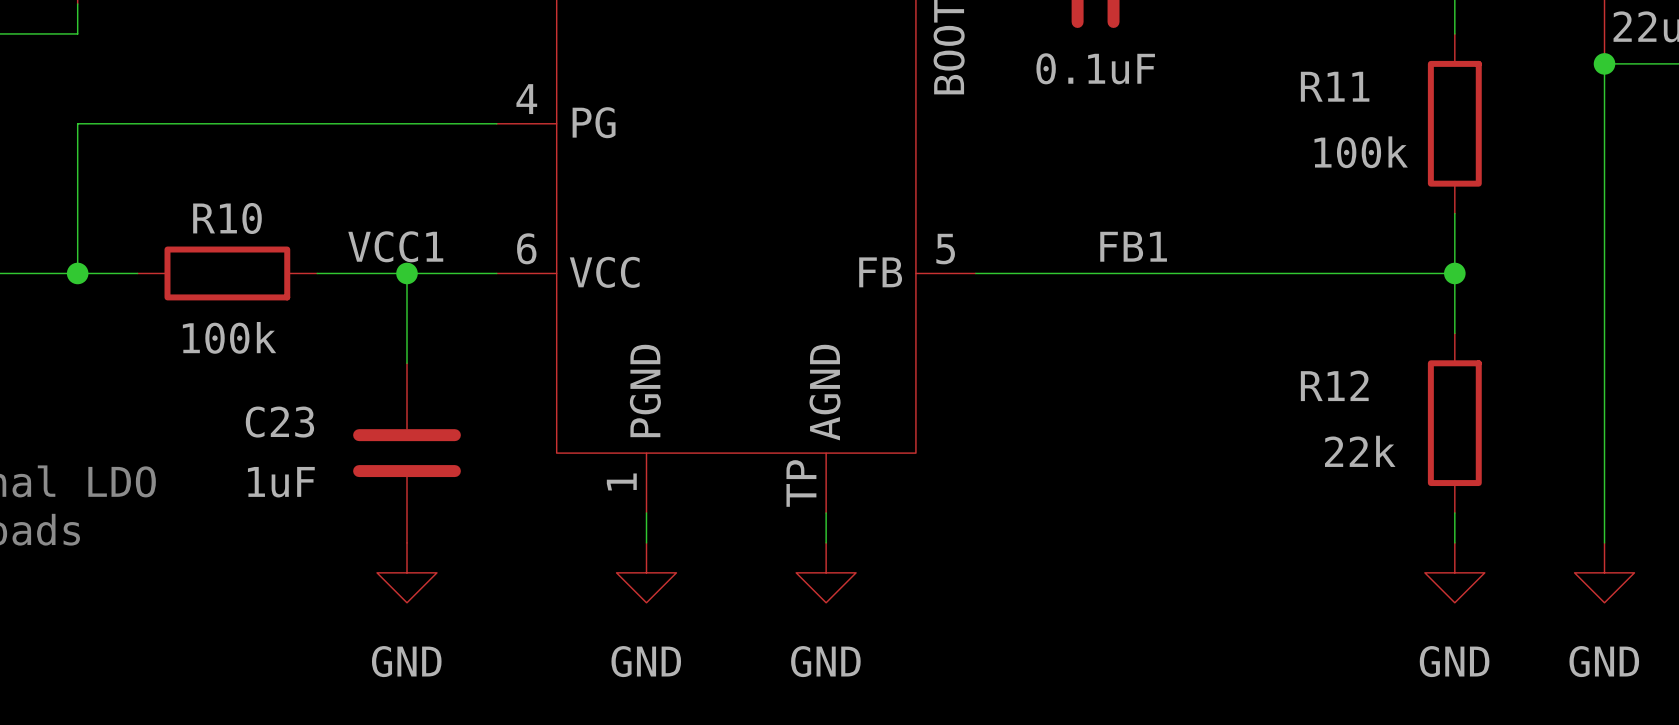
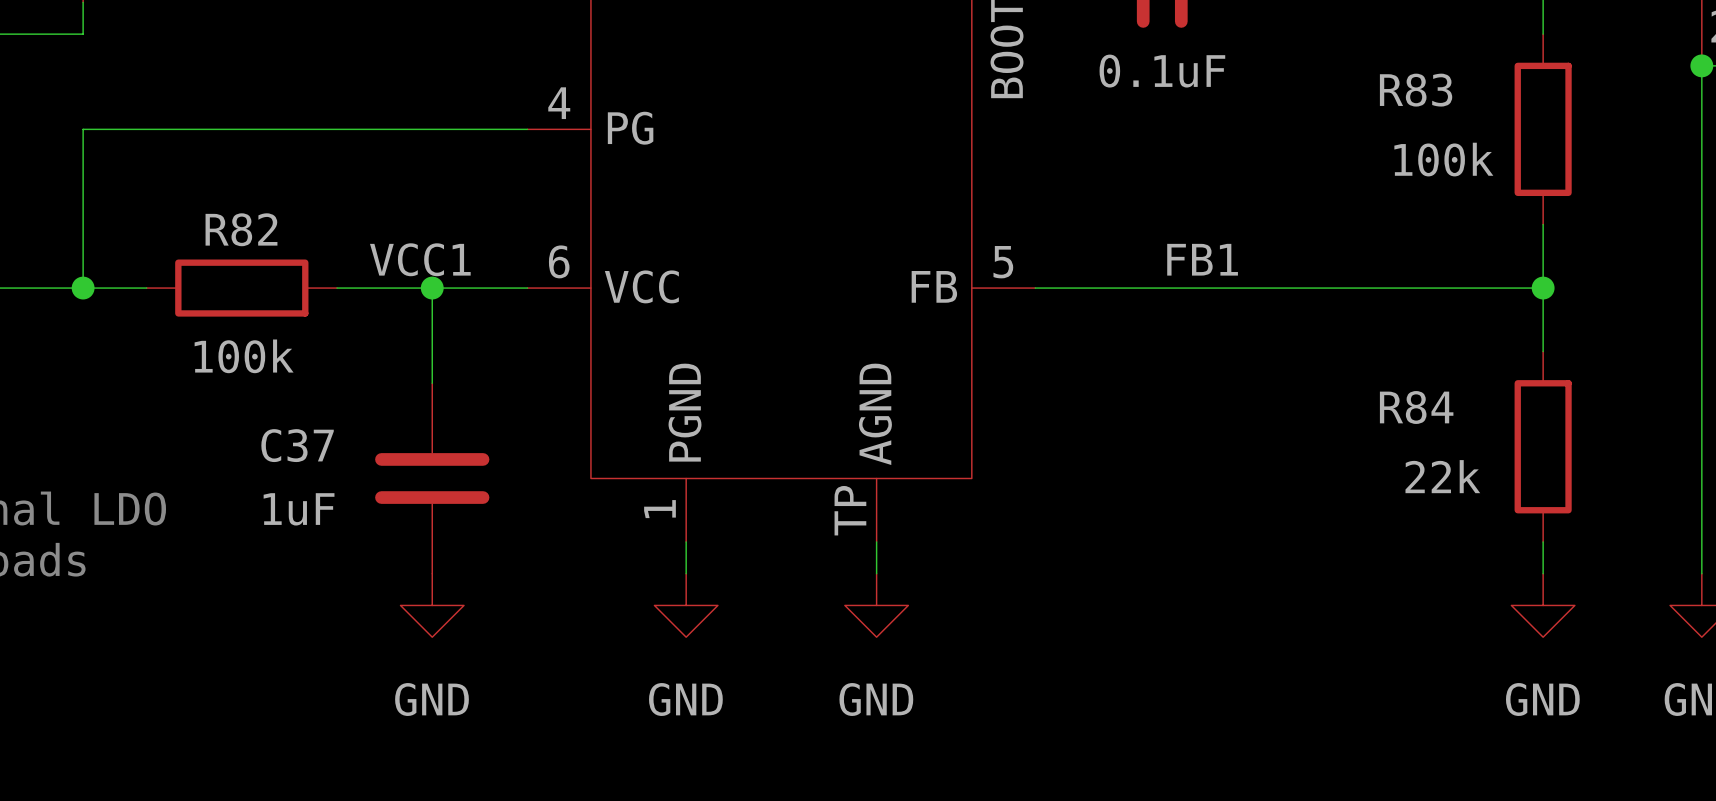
R11 name: R11 (1335, 86) -> R83 (1416, 90)
R10 name: R10 (227, 218) -> R82 (241, 229)
R12 name: R12 (1334, 385) -> R84 (1416, 407)
C23 name: C23 (279, 422) -> C37 (297, 445)

